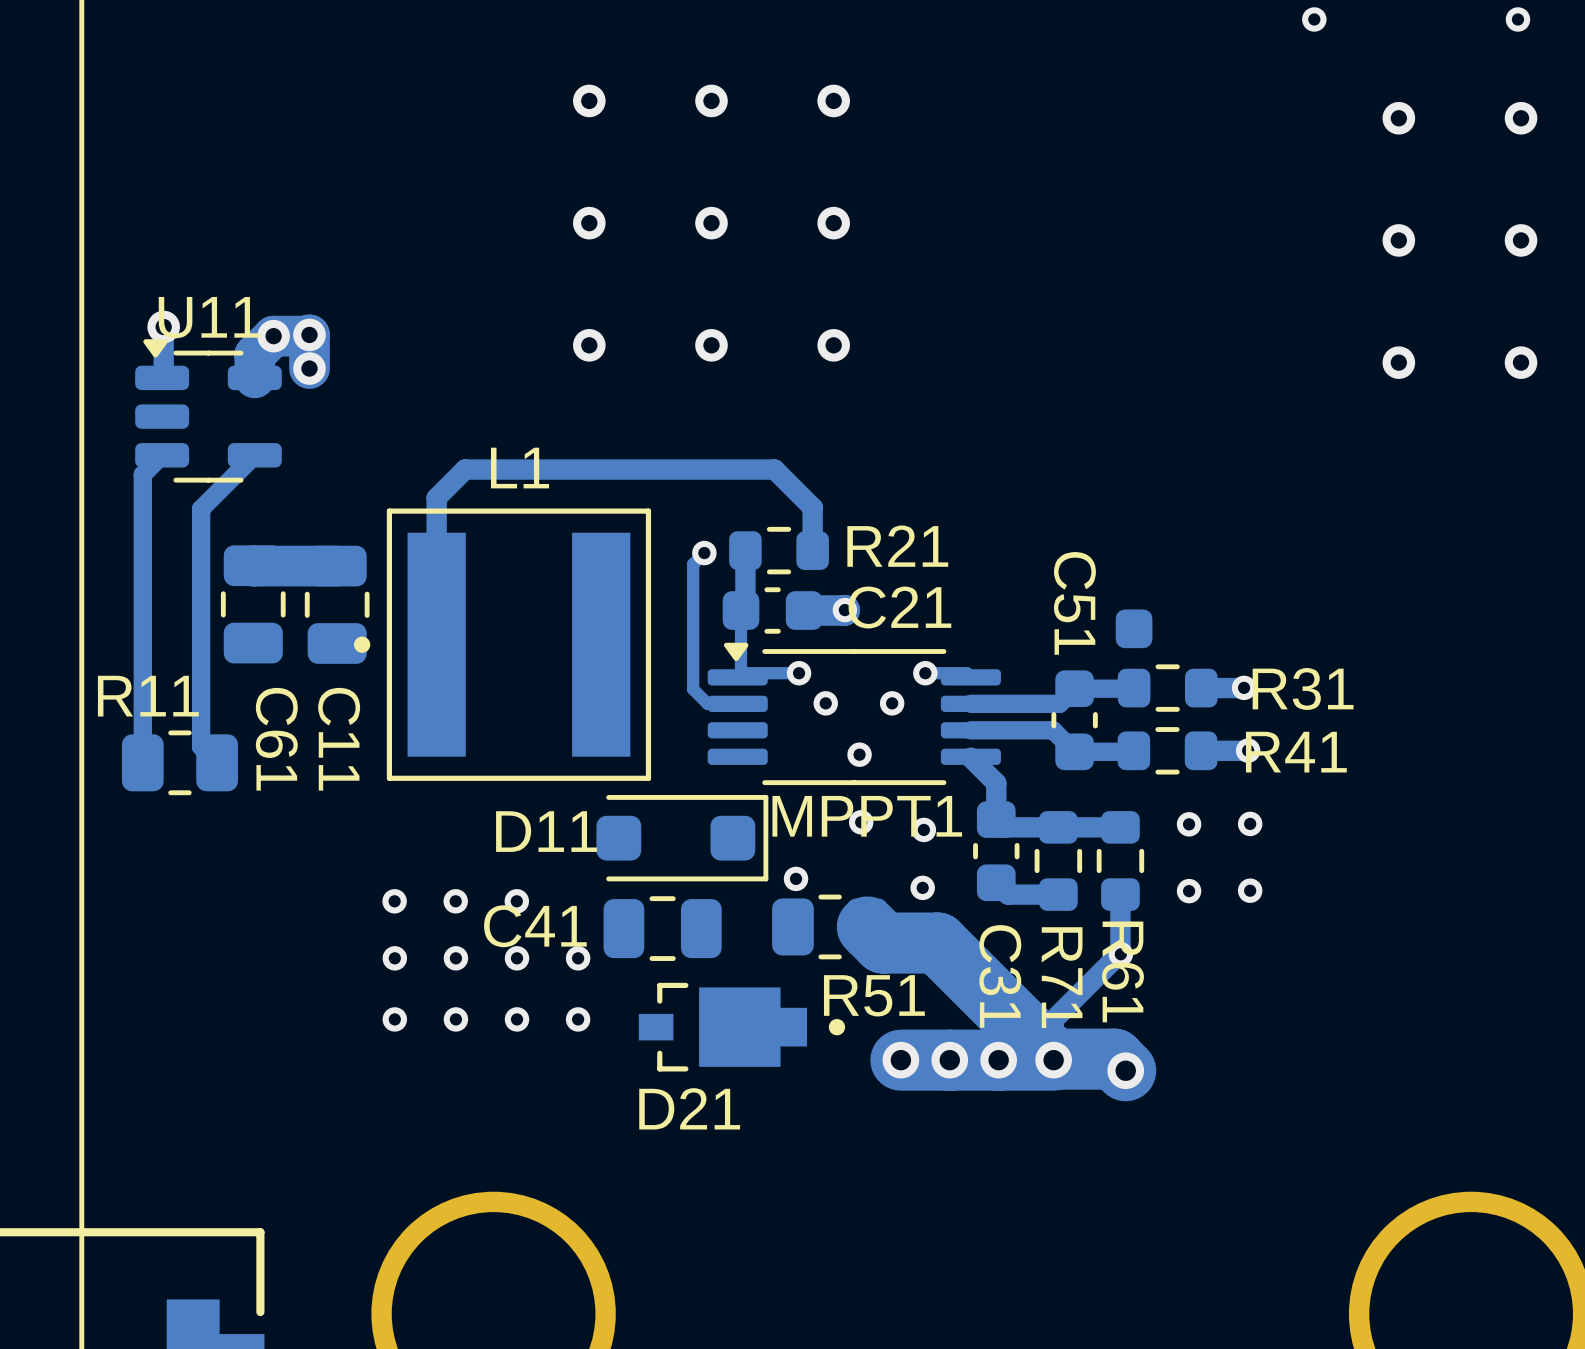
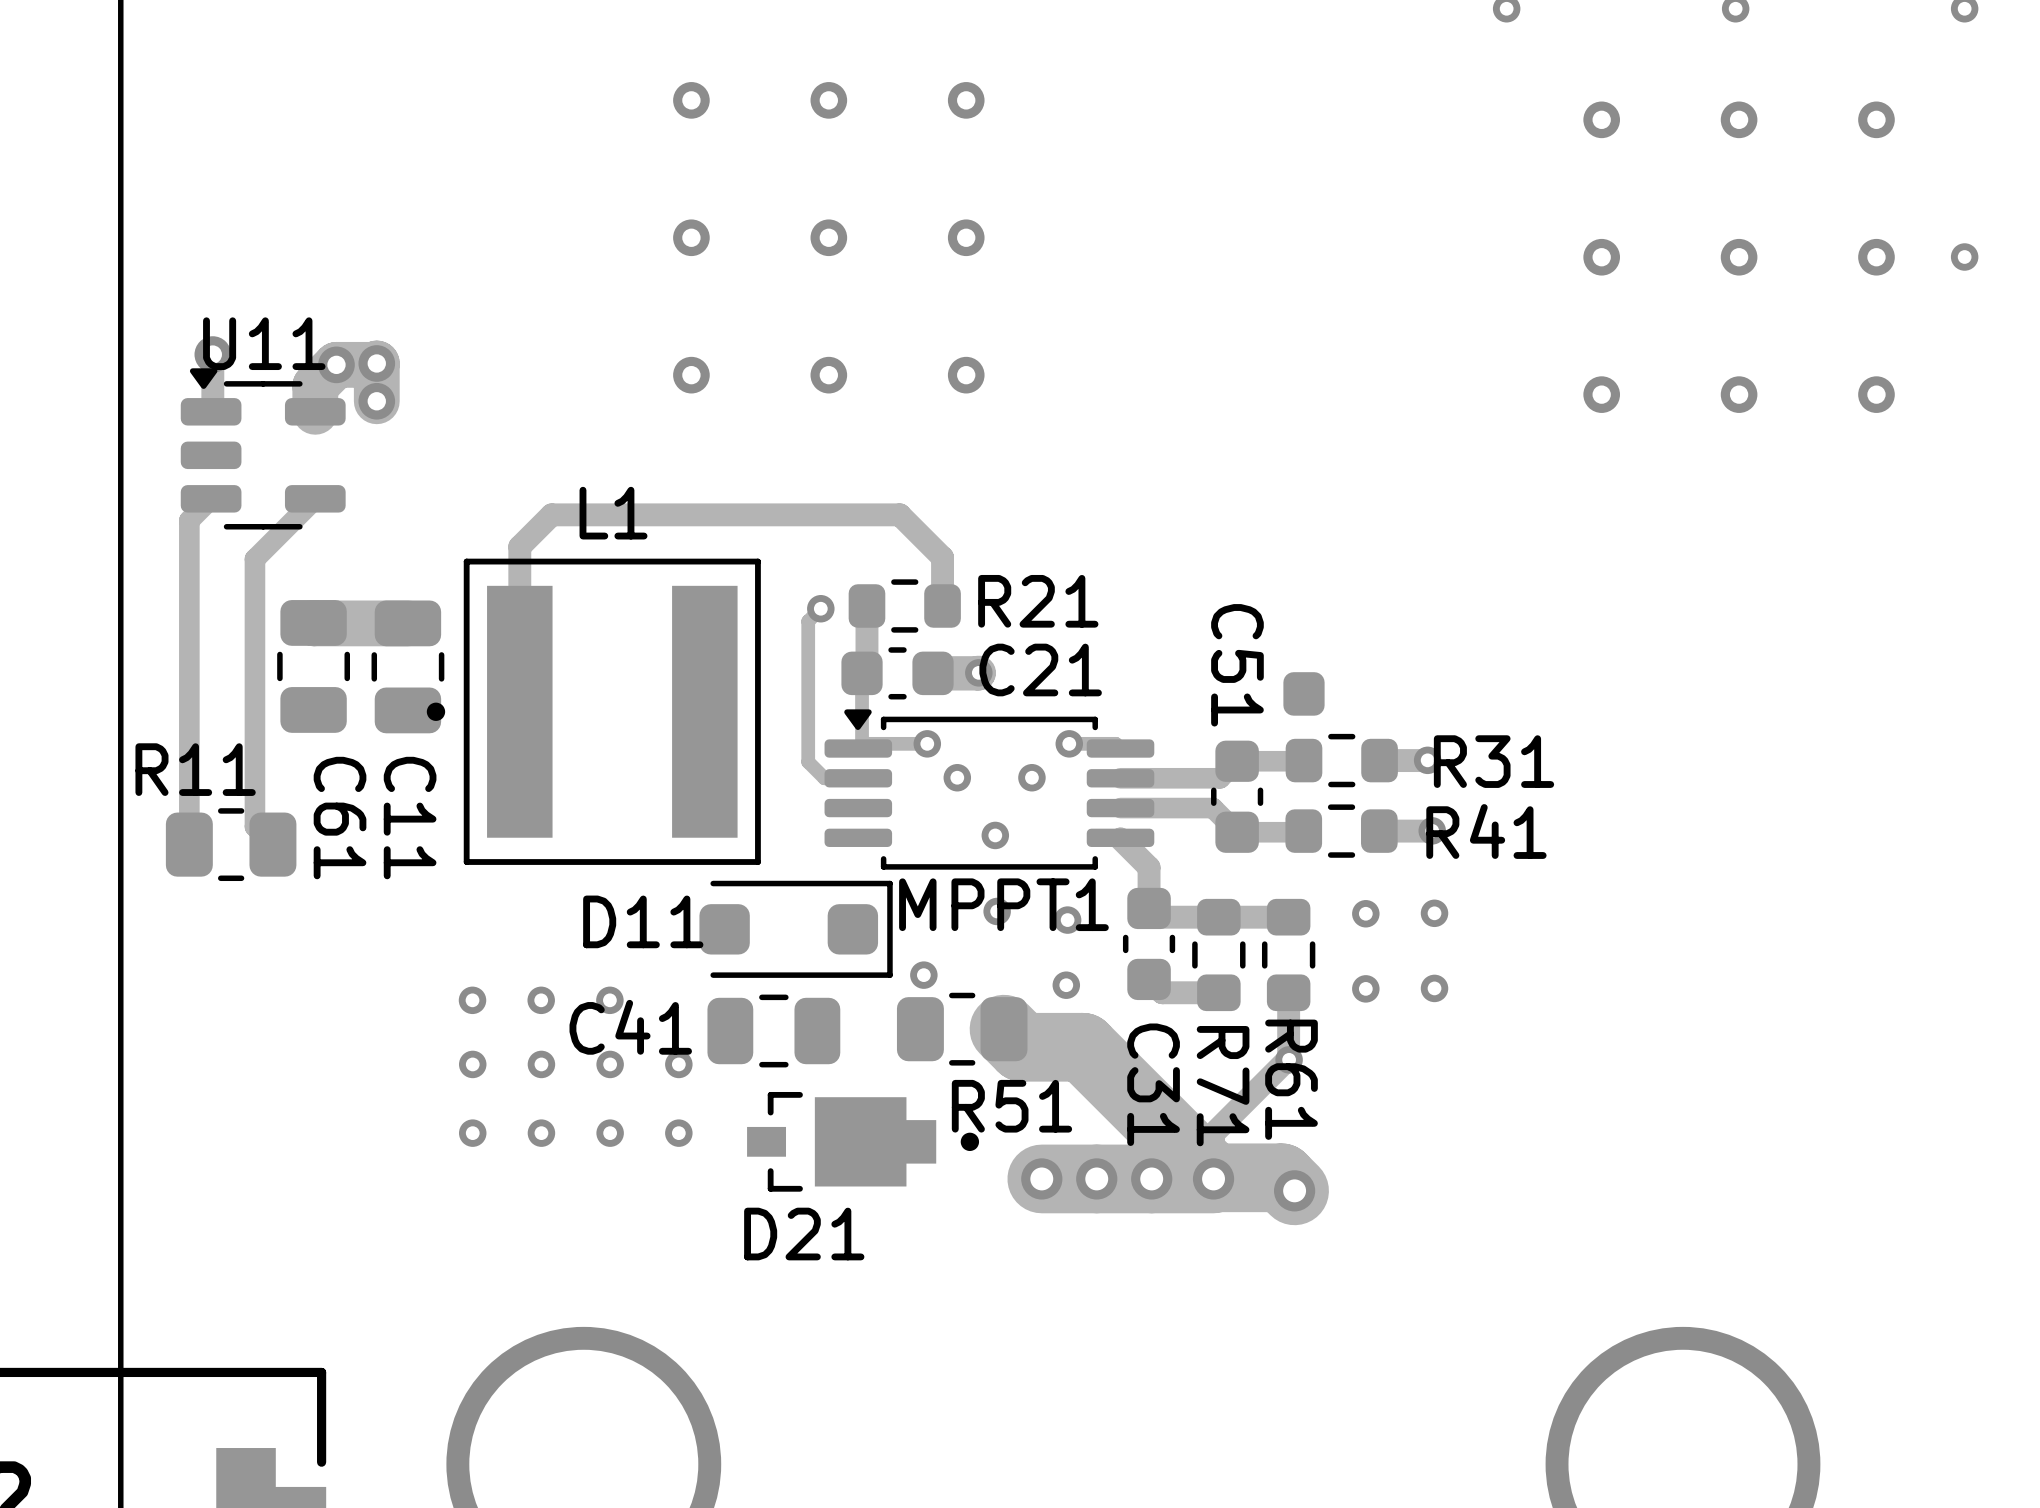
MPPT1 footprint: [707, 642, 1001, 786] -> [824, 709, 1155, 870]

